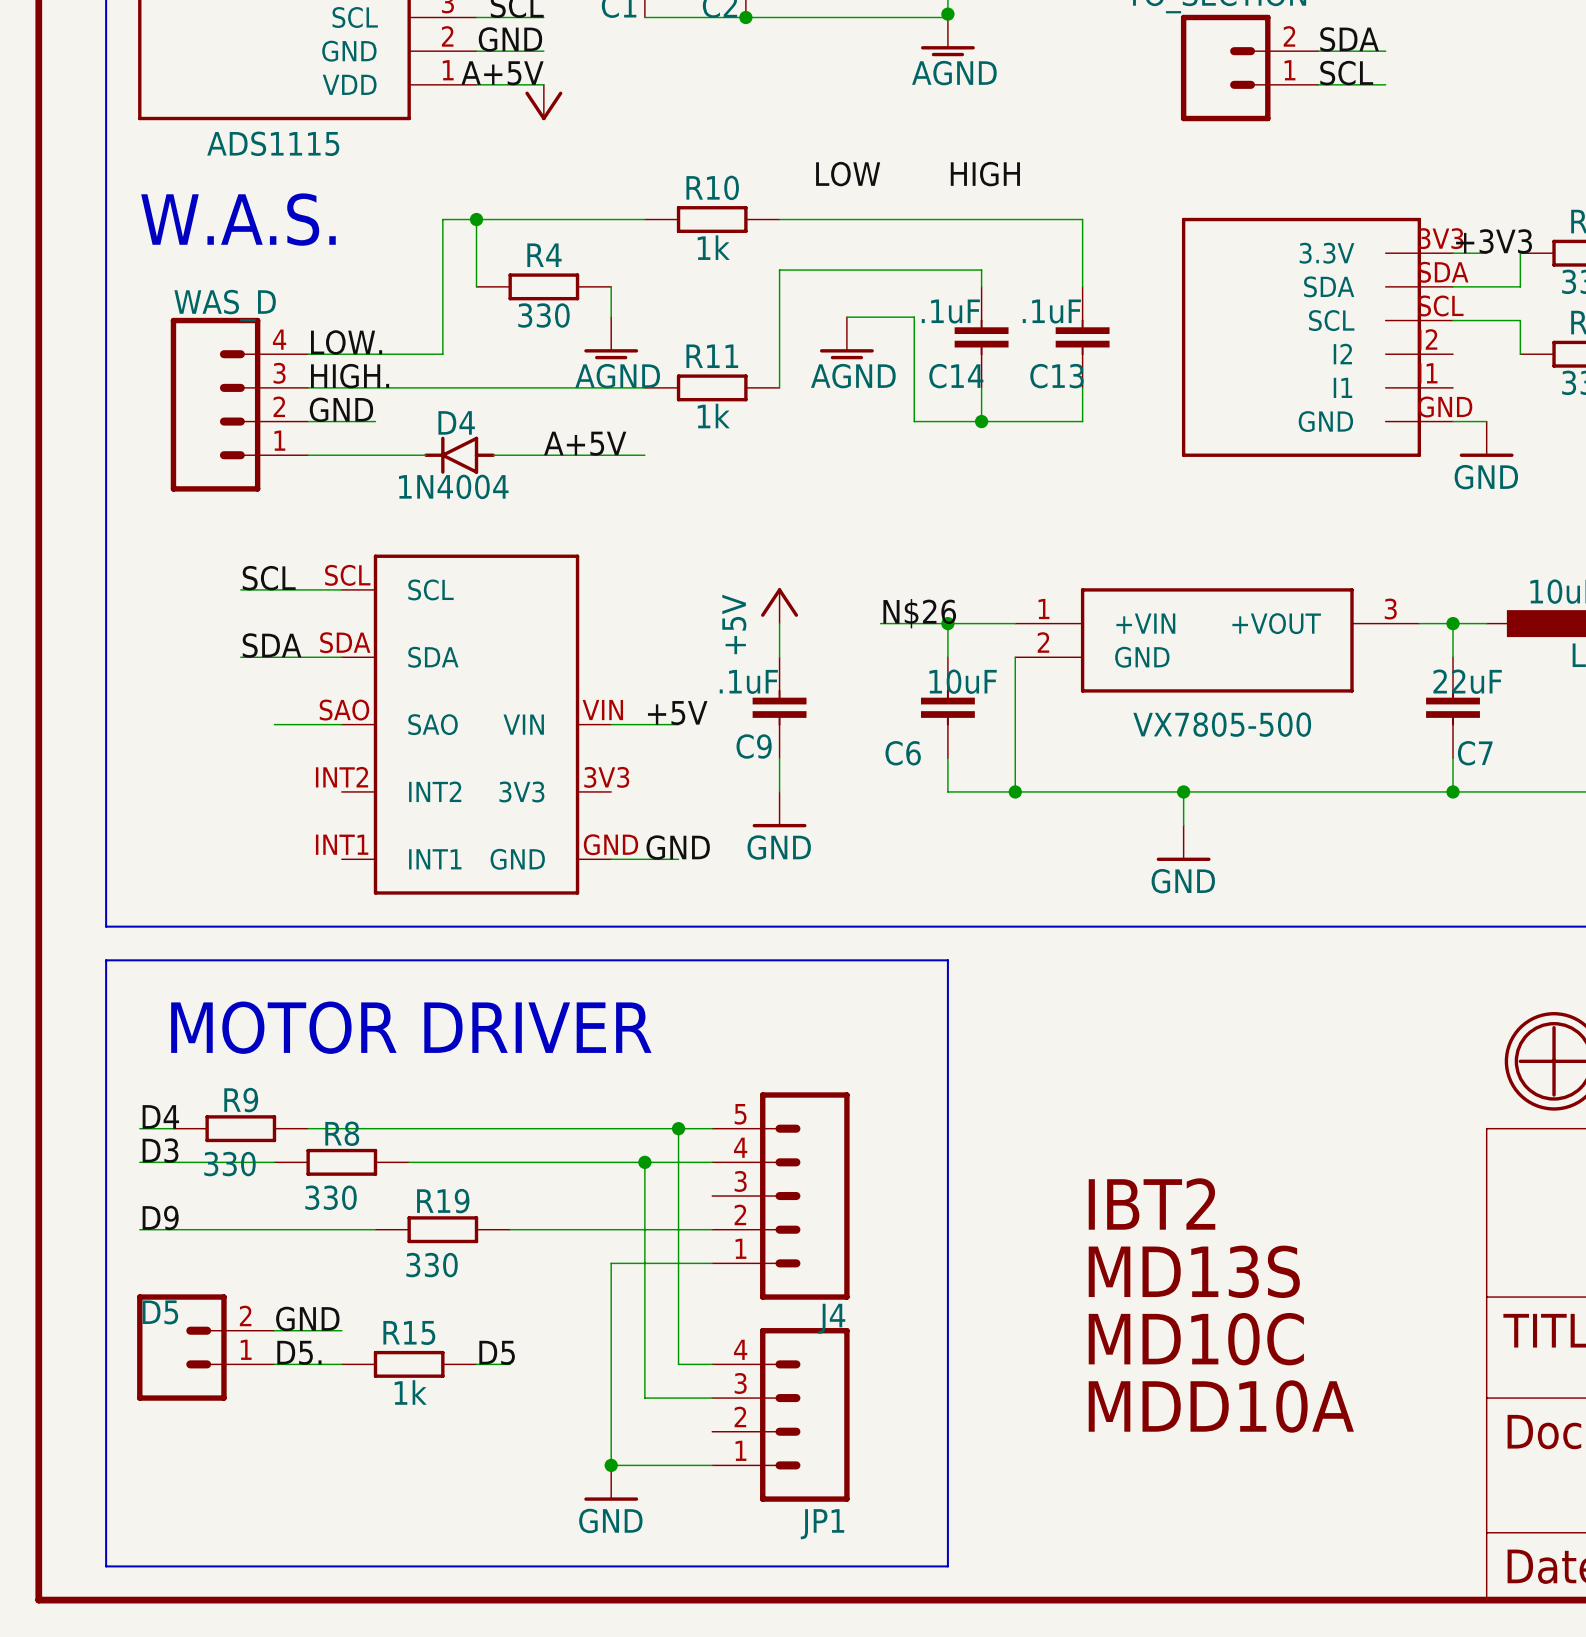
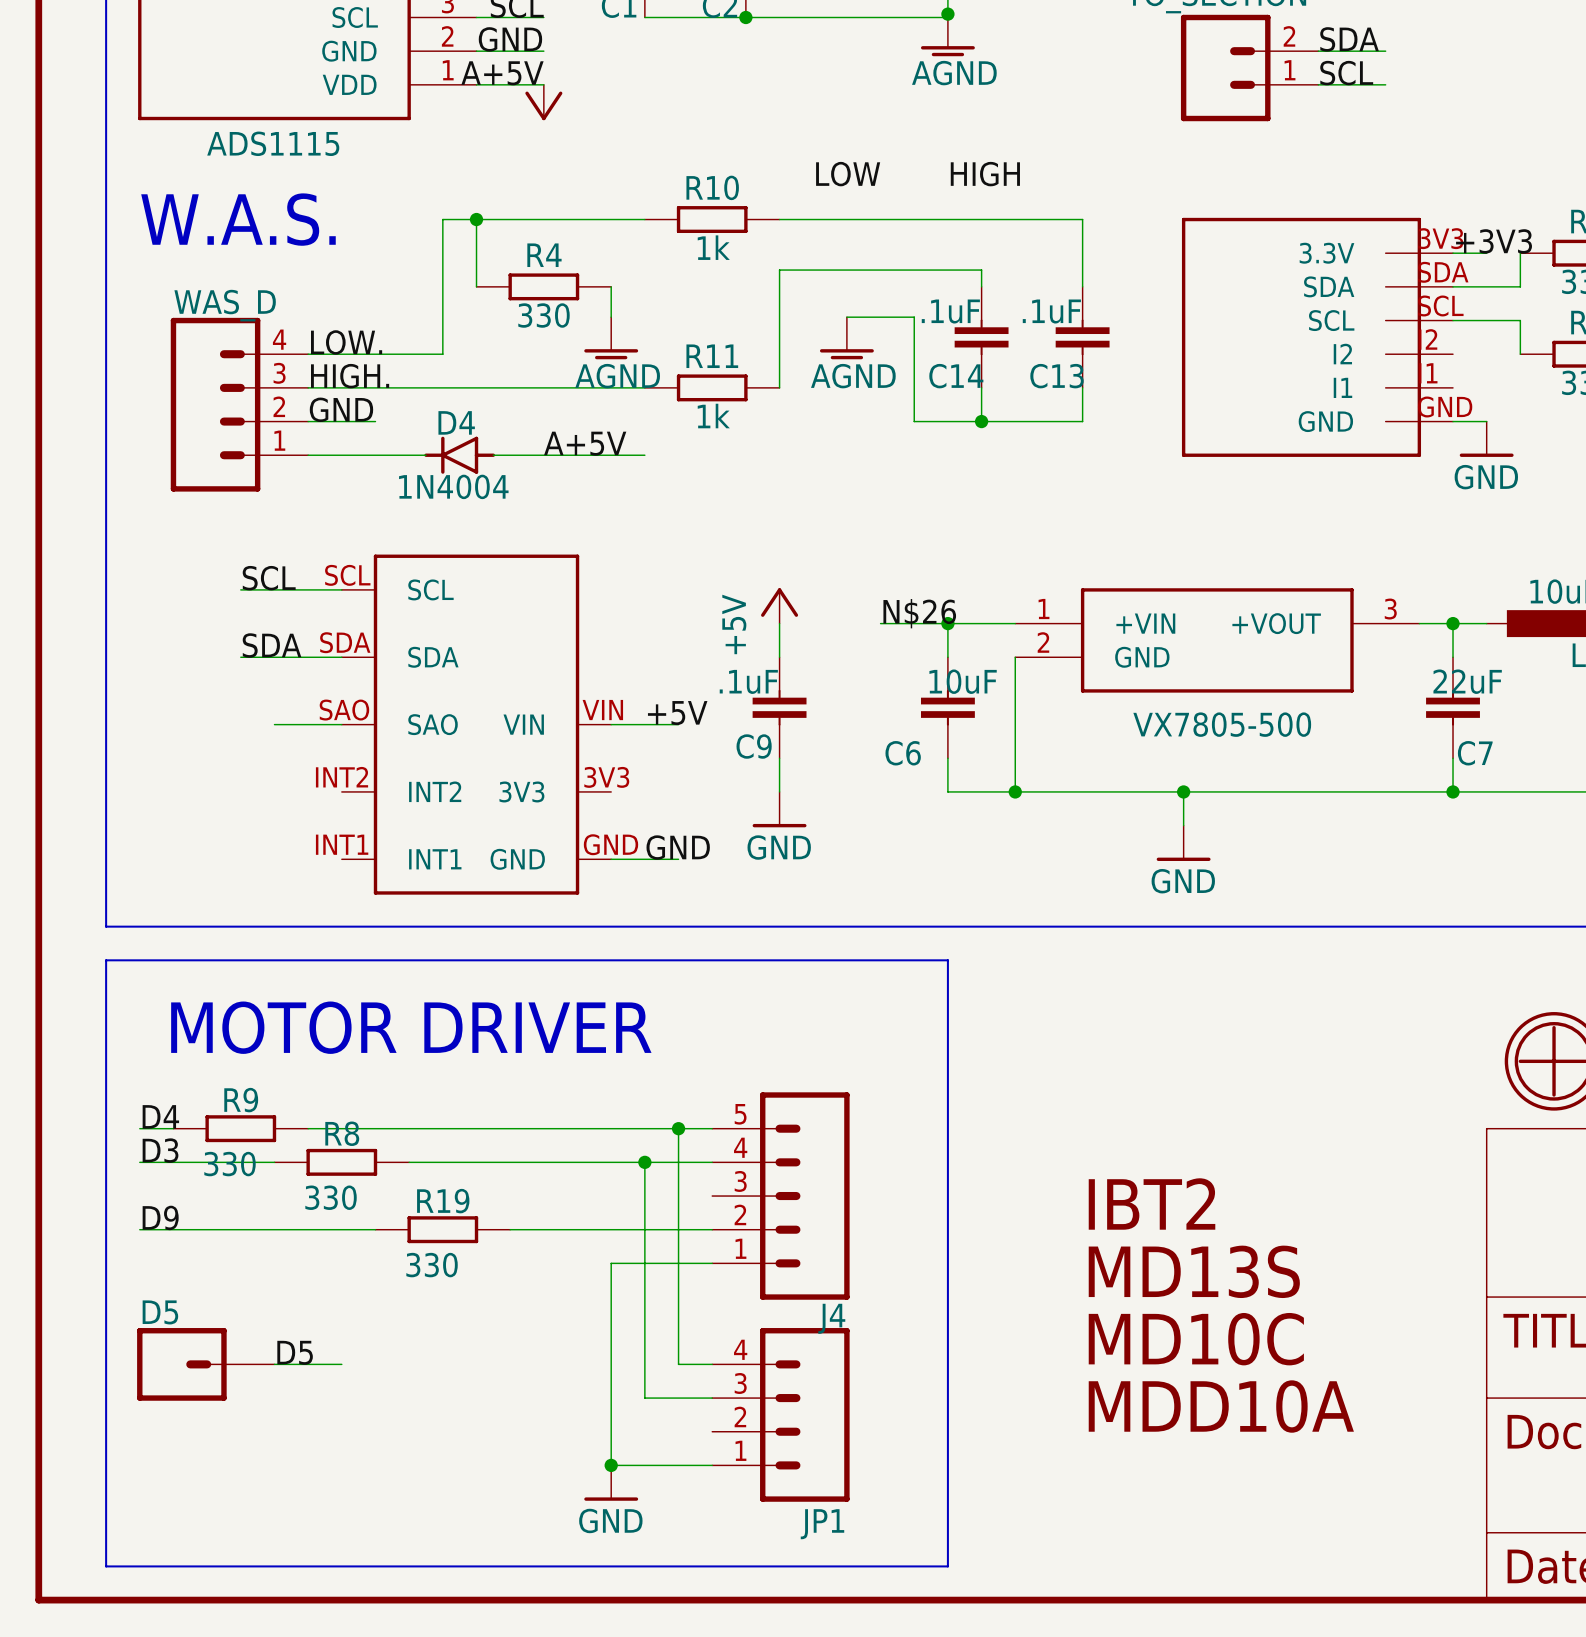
D5 symbol: [137, 1294, 275, 1401] -> [137, 1328, 275, 1401]
label: GND (307, 1318) -> none
wire: (274, 1330) (341, 1330) -> none
label: D5. (299, 1352) -> D5 (295, 1352)
label: D5 (497, 1352) -> none
R15: 1k (409, 1364) -> none
wire: (476, 1364) (510, 1364) -> none

